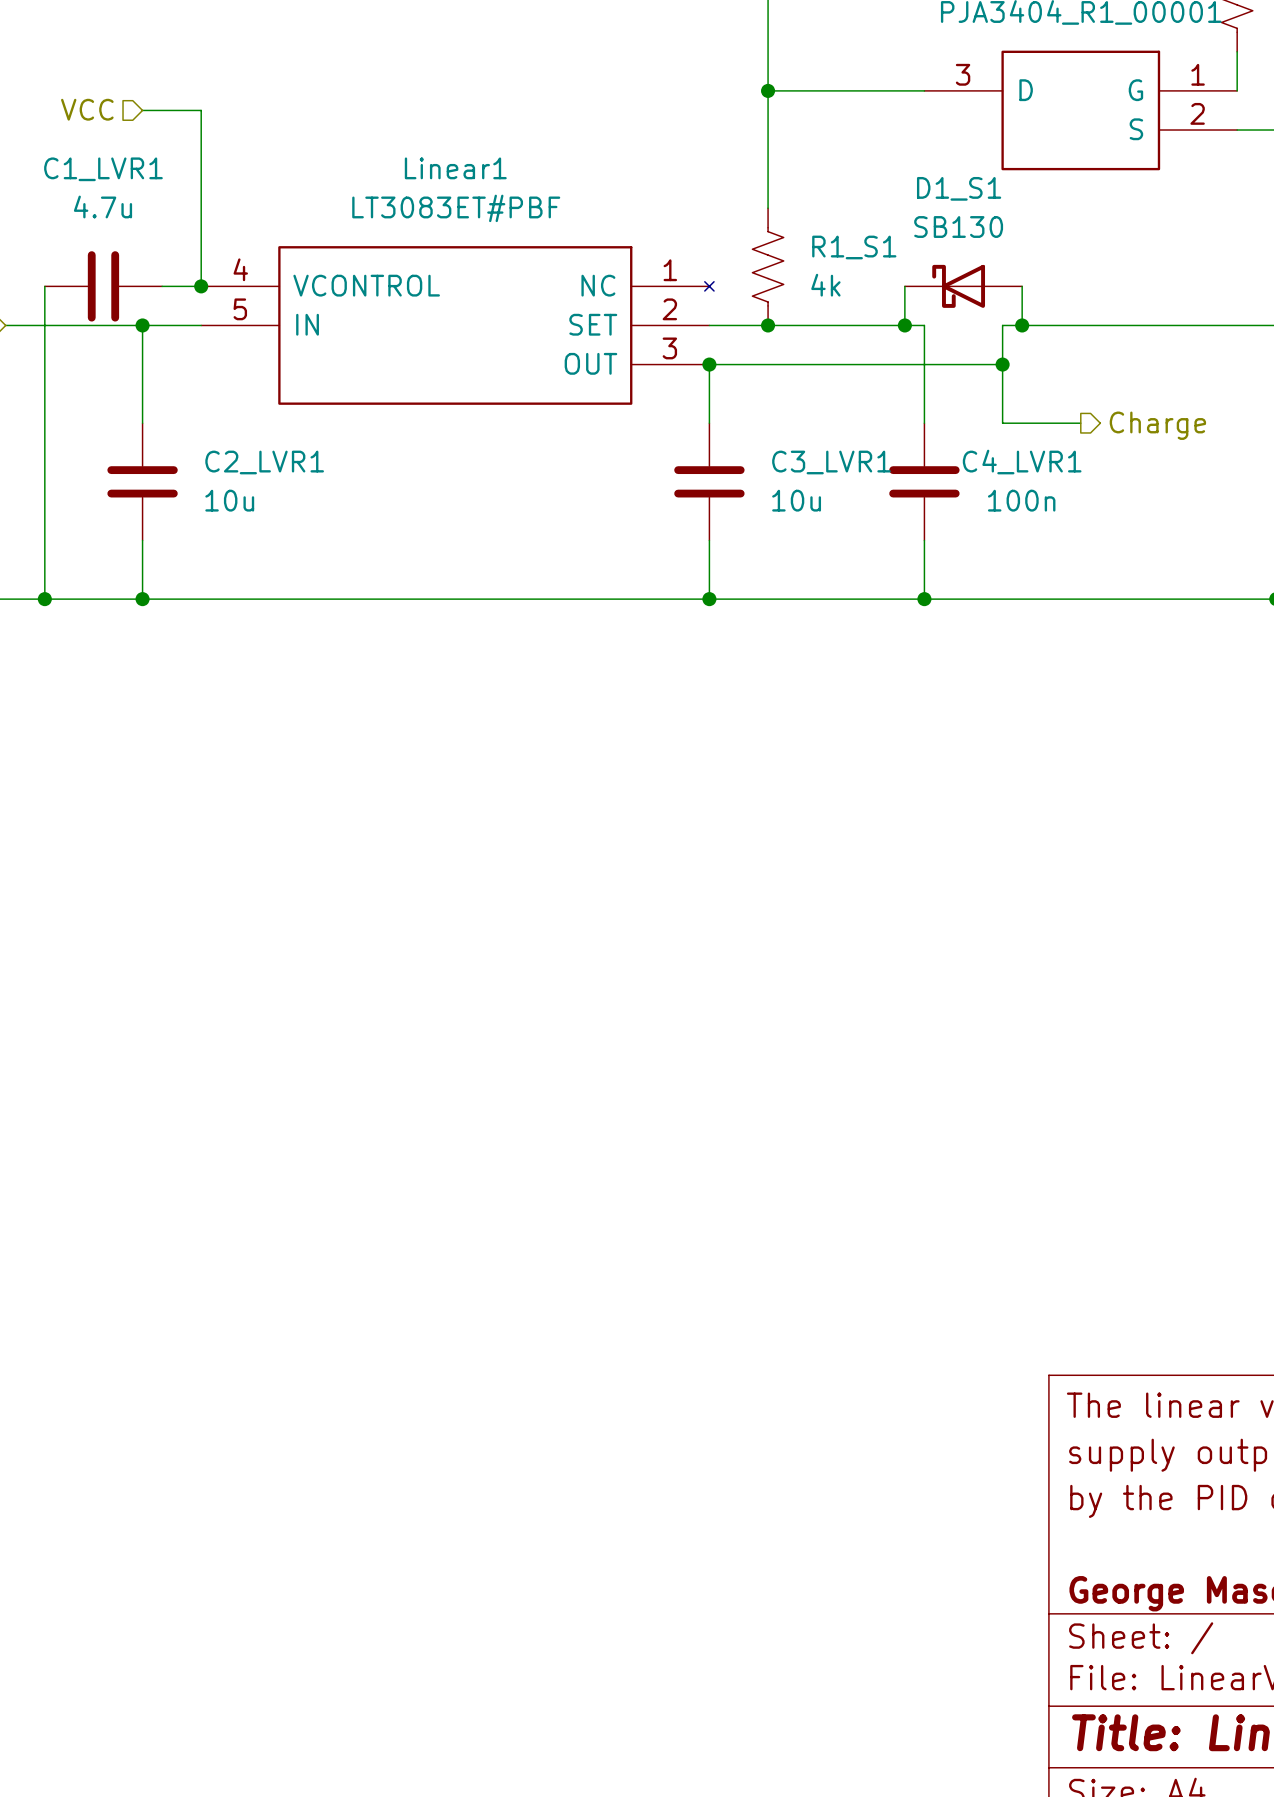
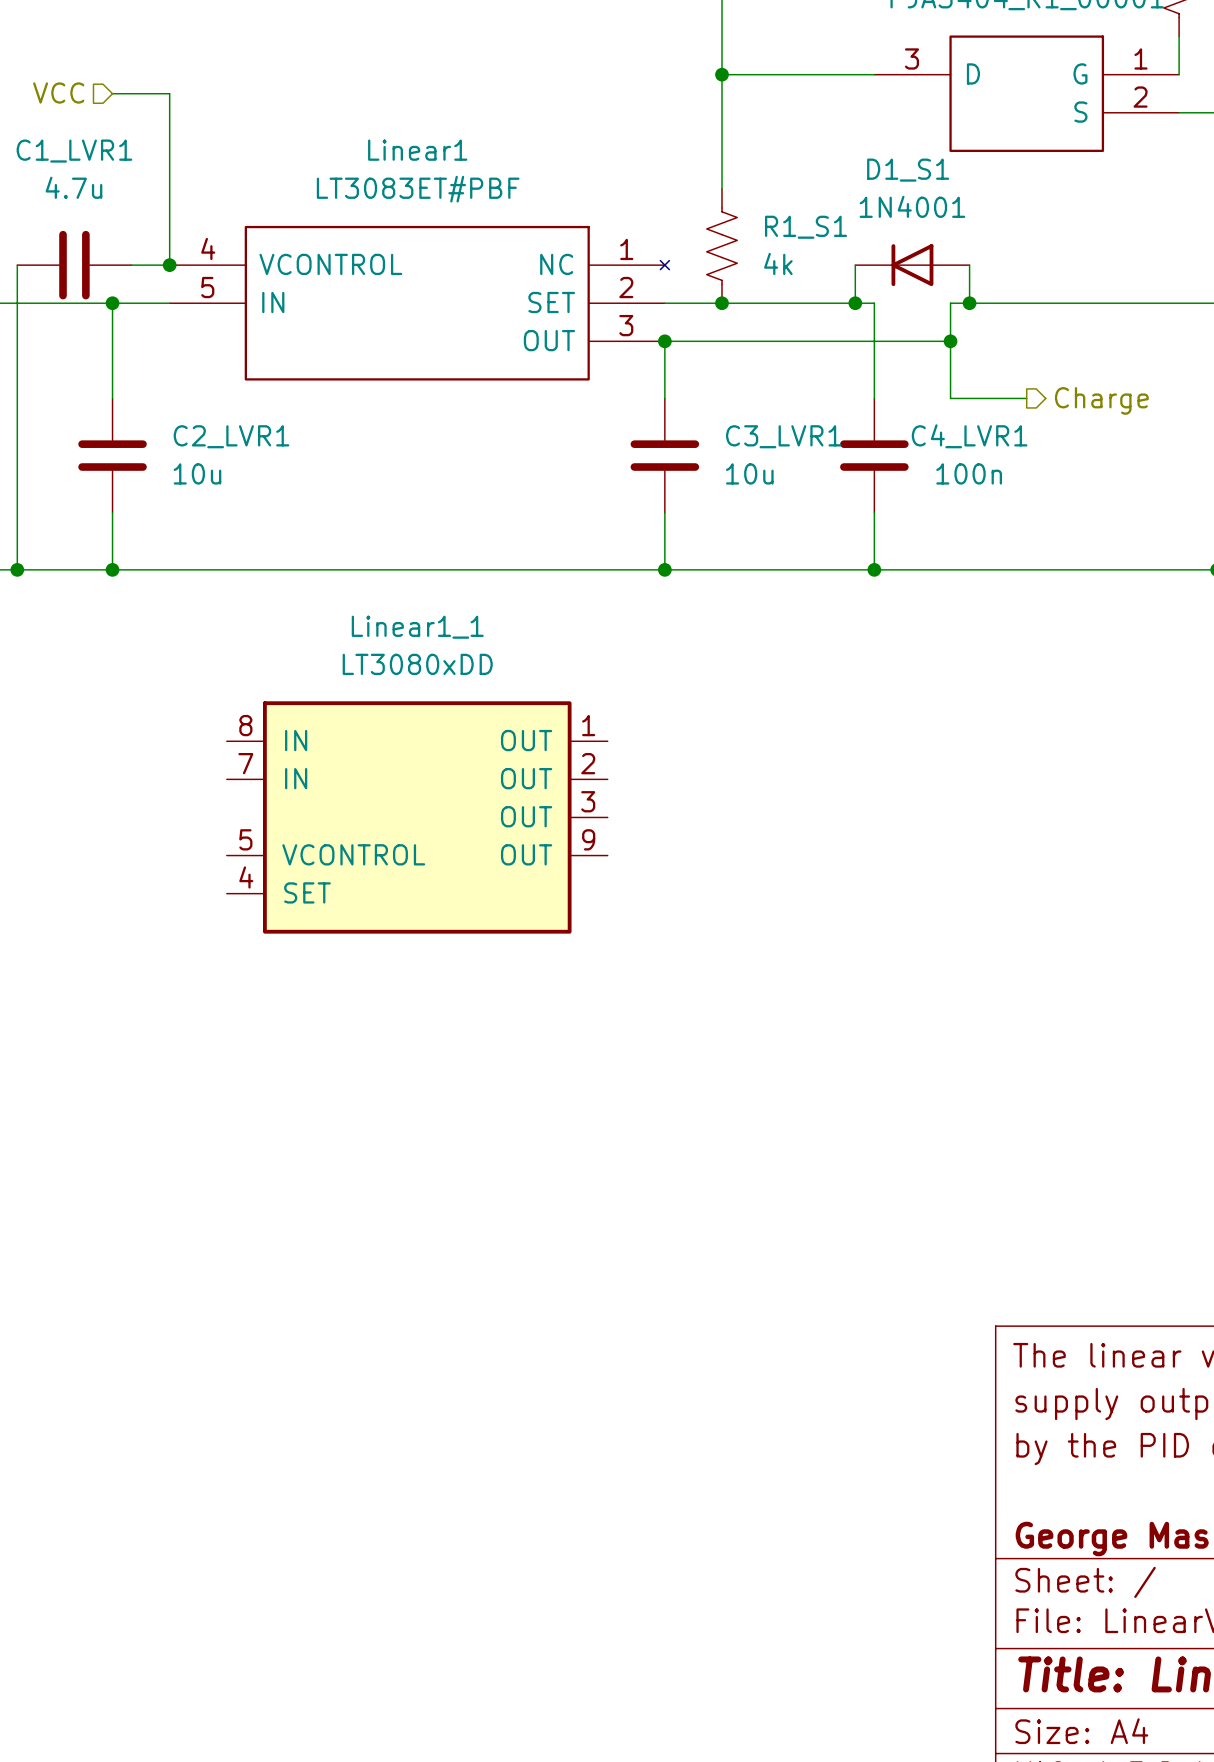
D1_S1 value: SB130 (958, 227) -> 1N4001 (912, 206)
D1_S1 symbol: [904, 264, 1023, 308] -> [855, 244, 970, 287]
Linear1_1: none -> LT3080xDD (417, 817)

